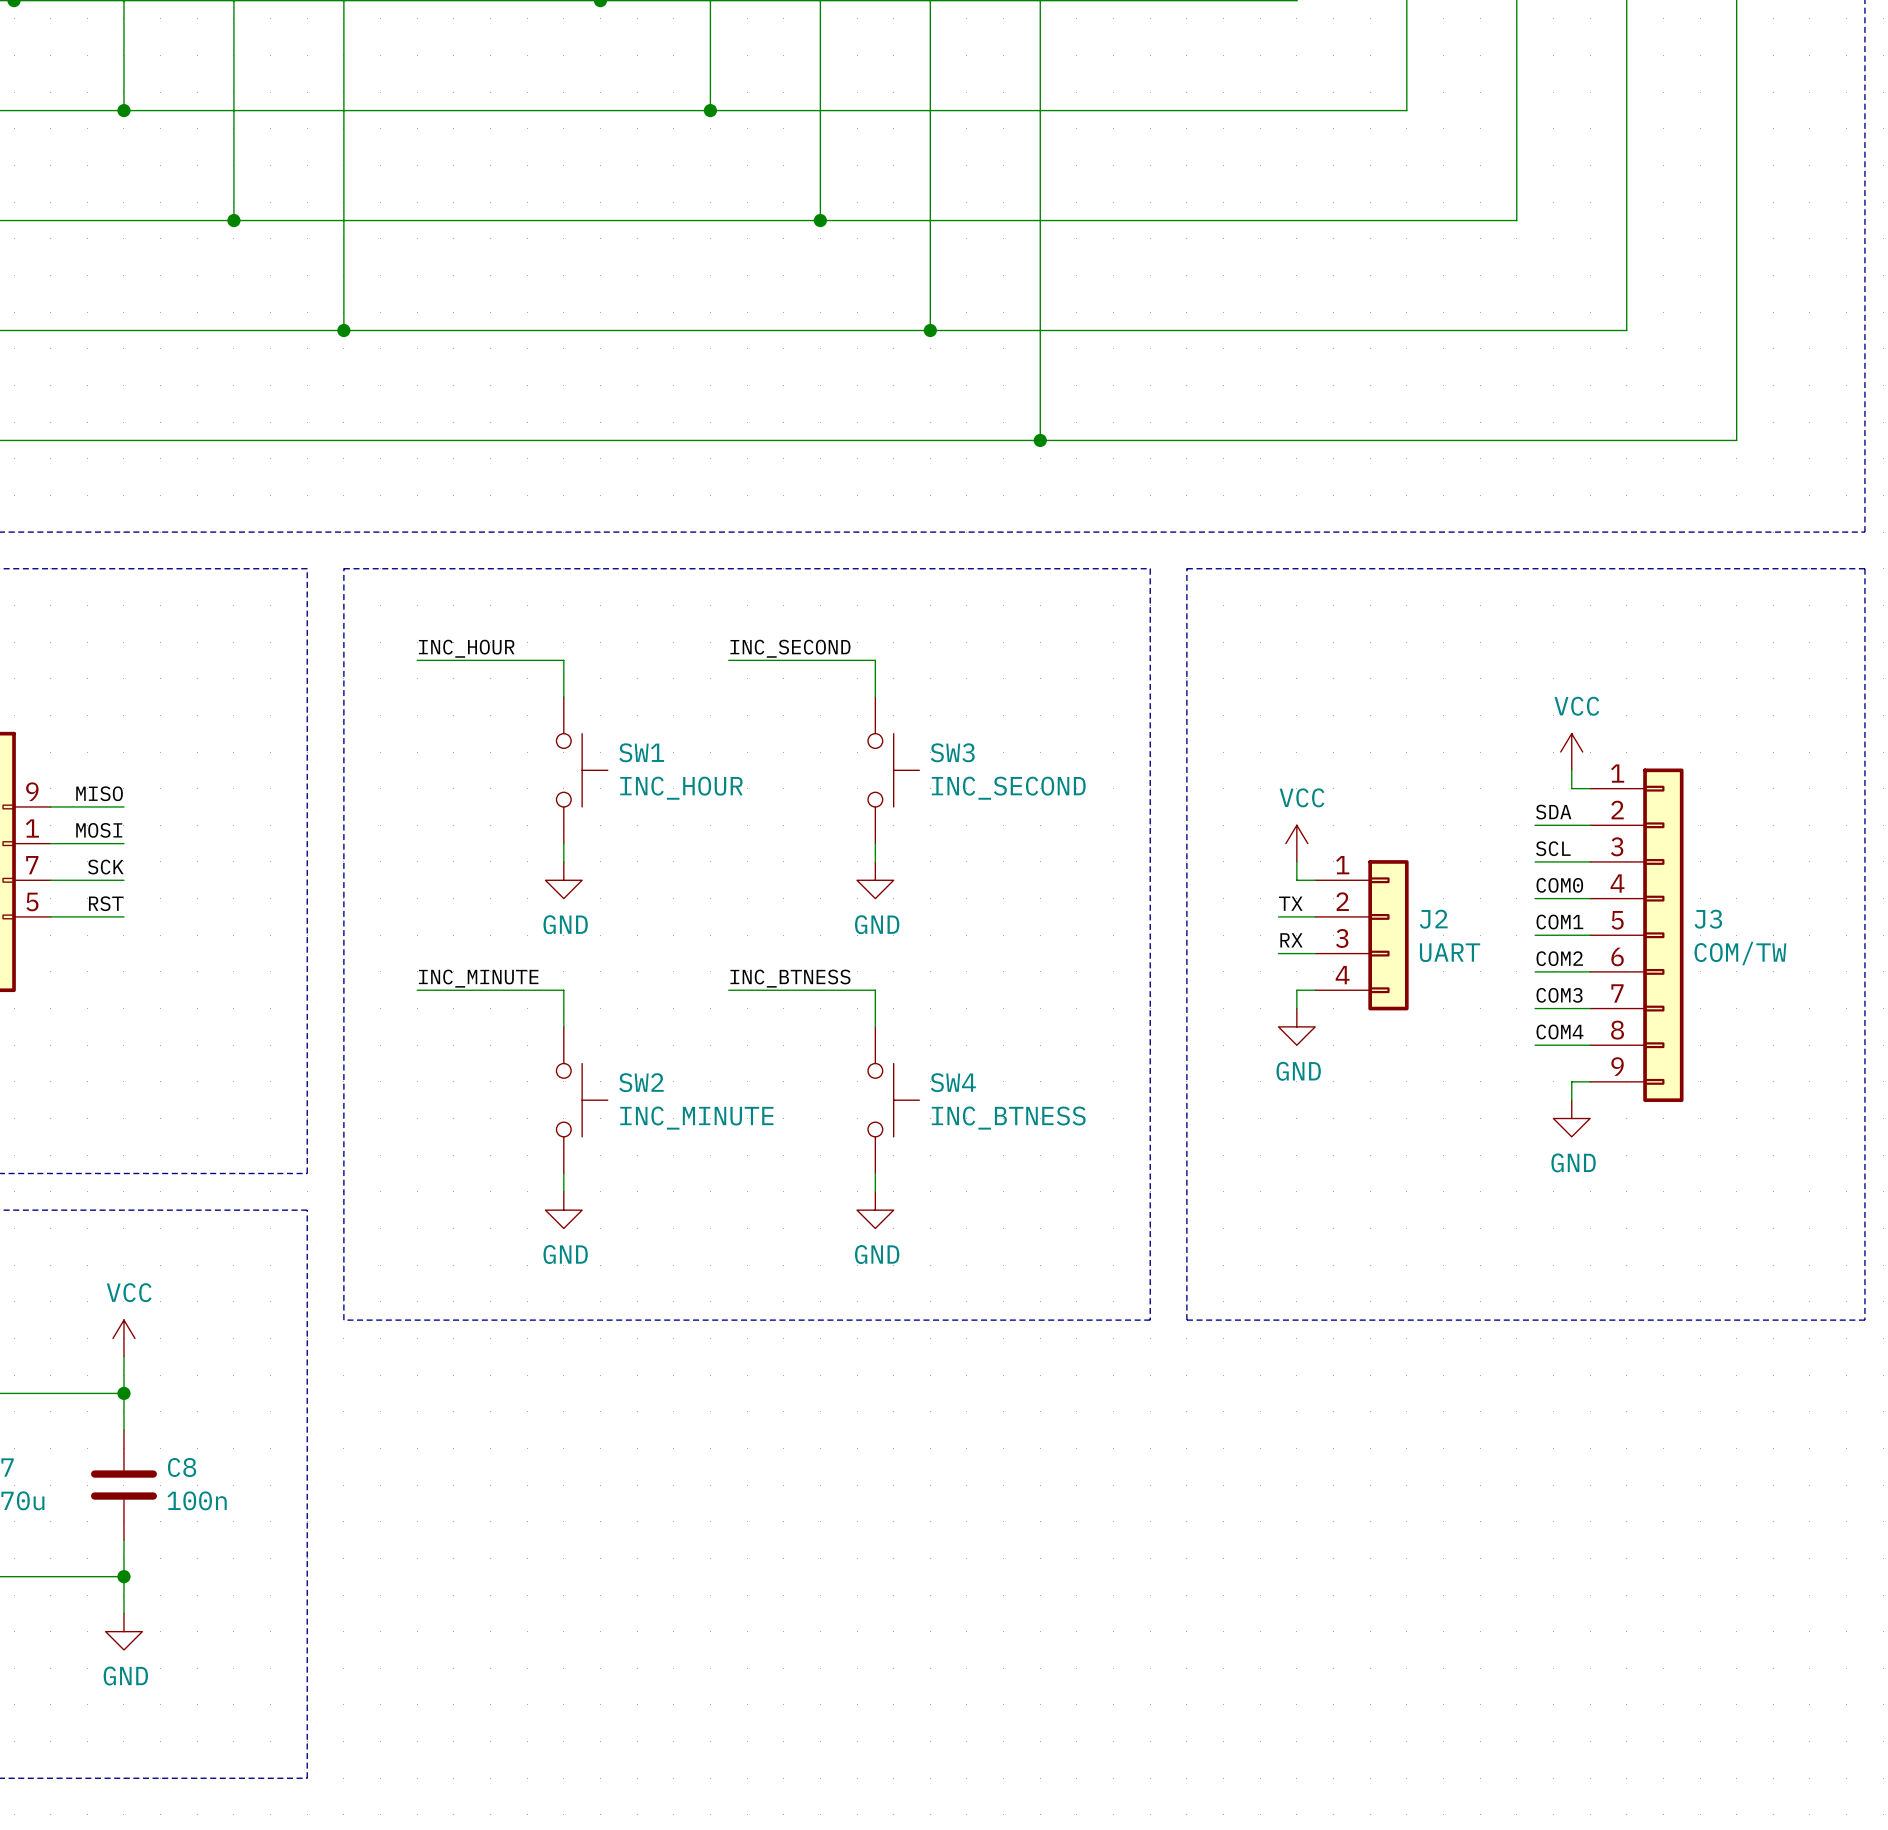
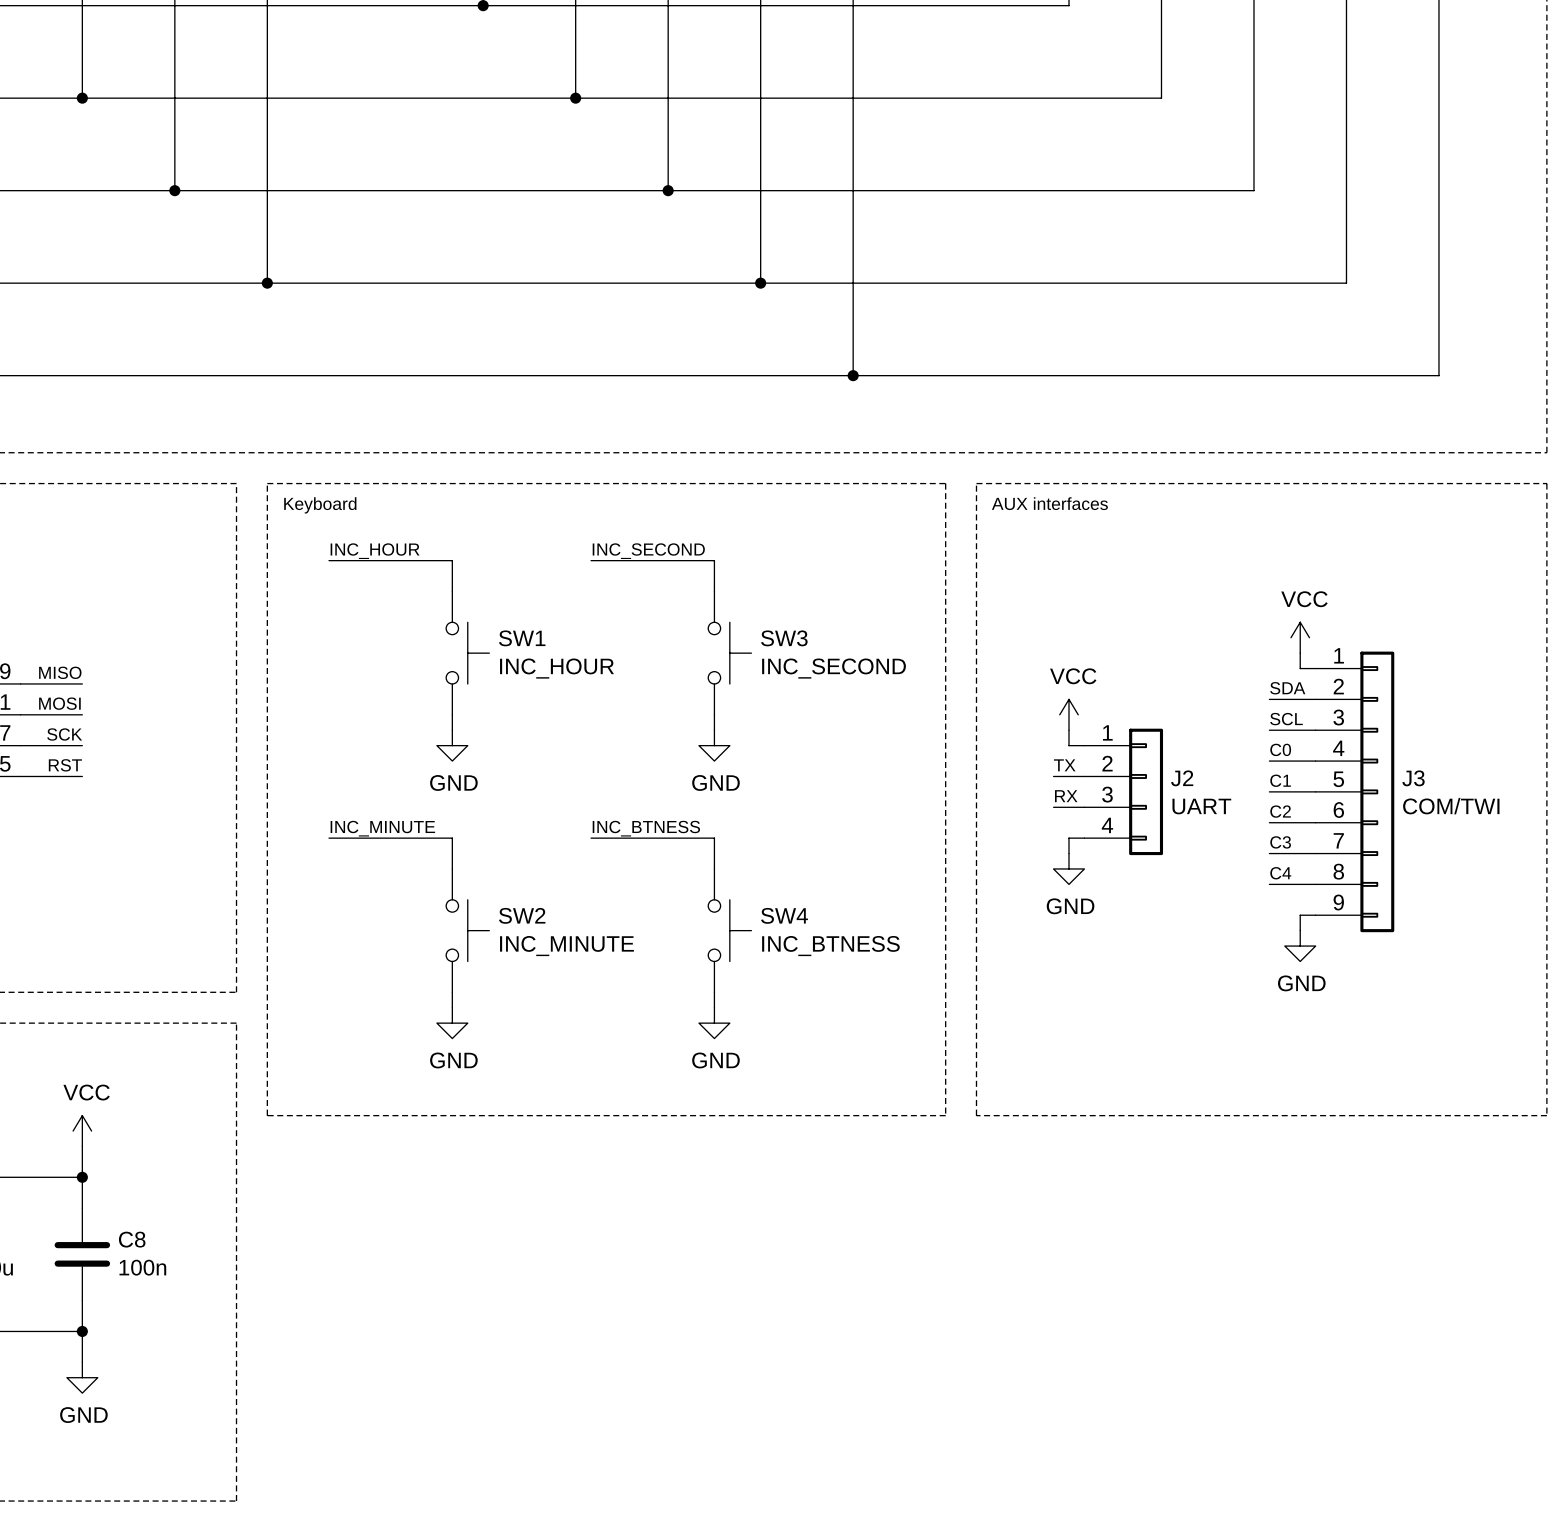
text: none -> AUX interfaces (1049, 503)
text: none -> Keyboard (320, 505)
label: COM0 (1559, 885) -> C0 (1280, 749)
label: COM1 (1559, 922) -> C1 (1280, 780)
J3 value: COM/TW (1740, 953) -> COM/TWI (1451, 806)
label: COM2 (1559, 958) -> C2 (1280, 811)
label: COM3 (1559, 995) -> C3 (1280, 842)
label: COM4 (1559, 1031) -> C4 (1280, 873)

